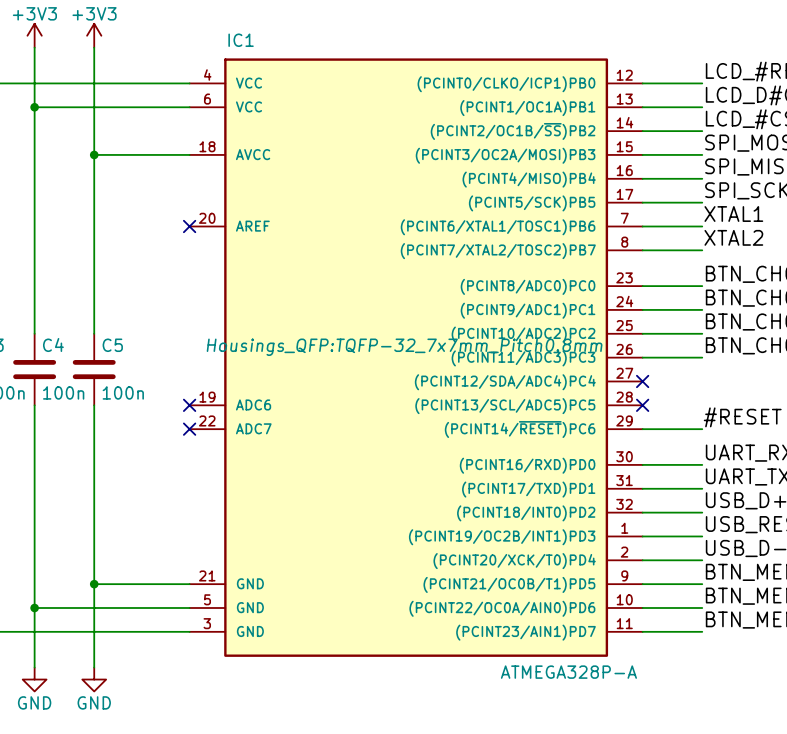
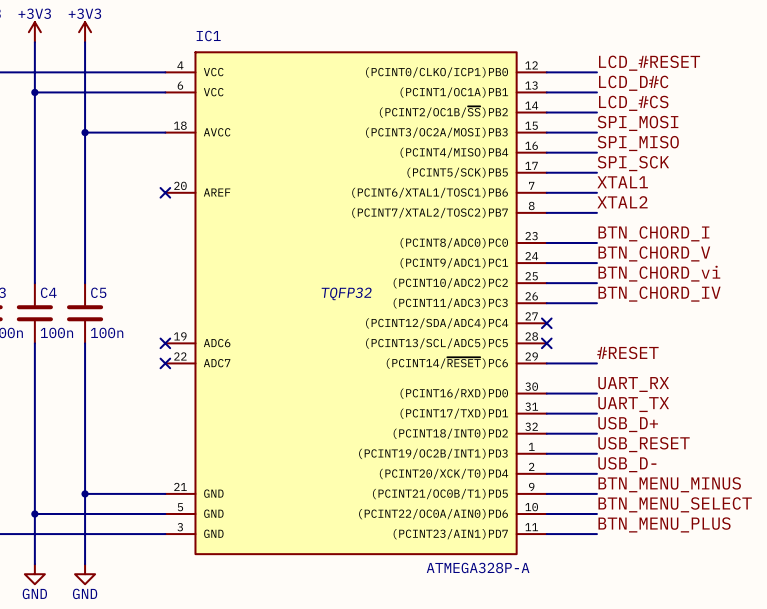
IC1 text: Housings_QFP:TQFP-32_7x7mm_Pitch0.8mm (404, 347) -> TQFP32 (346, 293)

